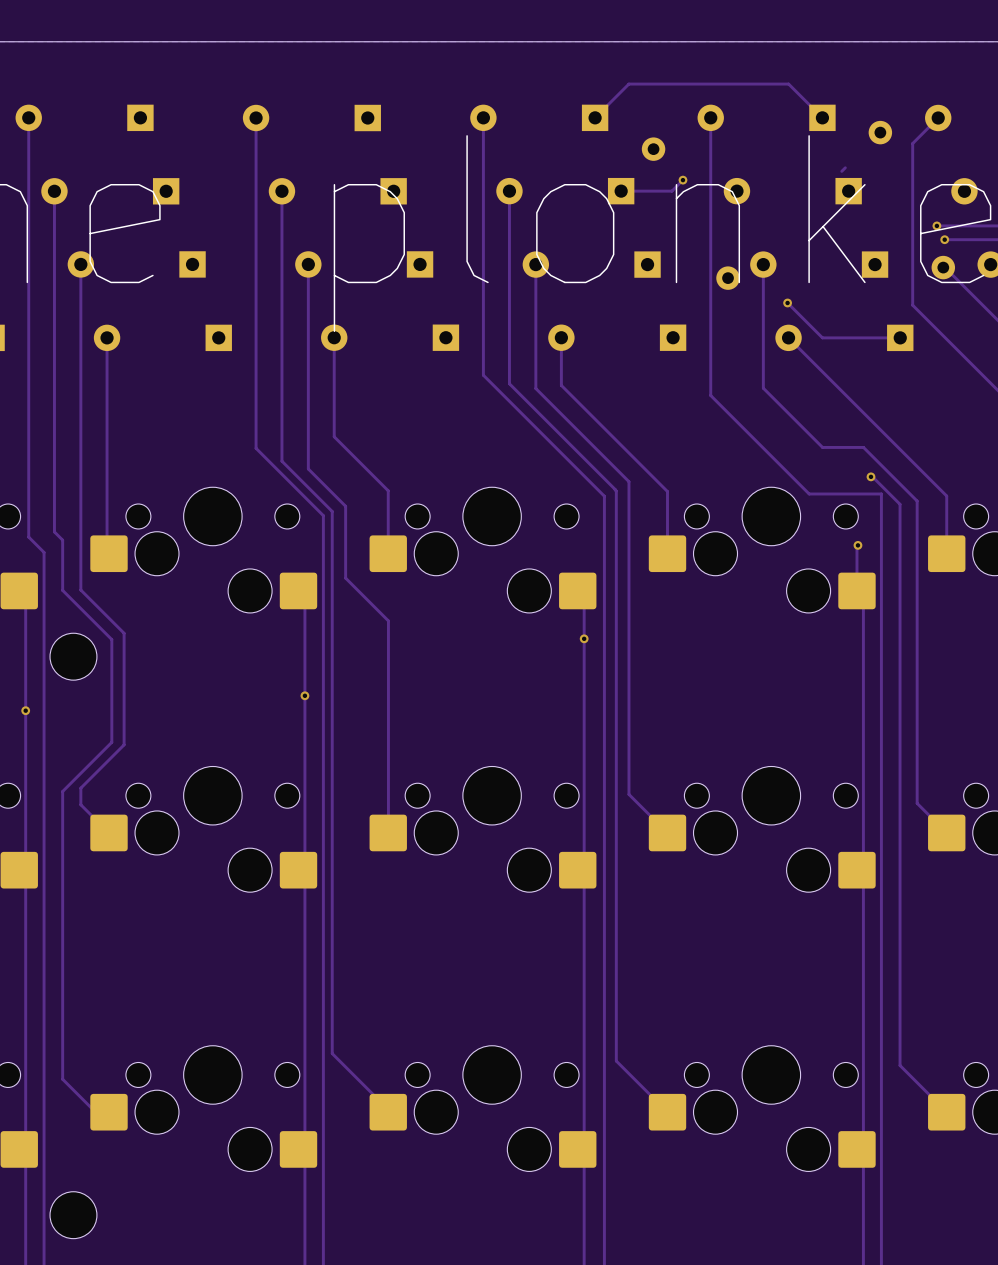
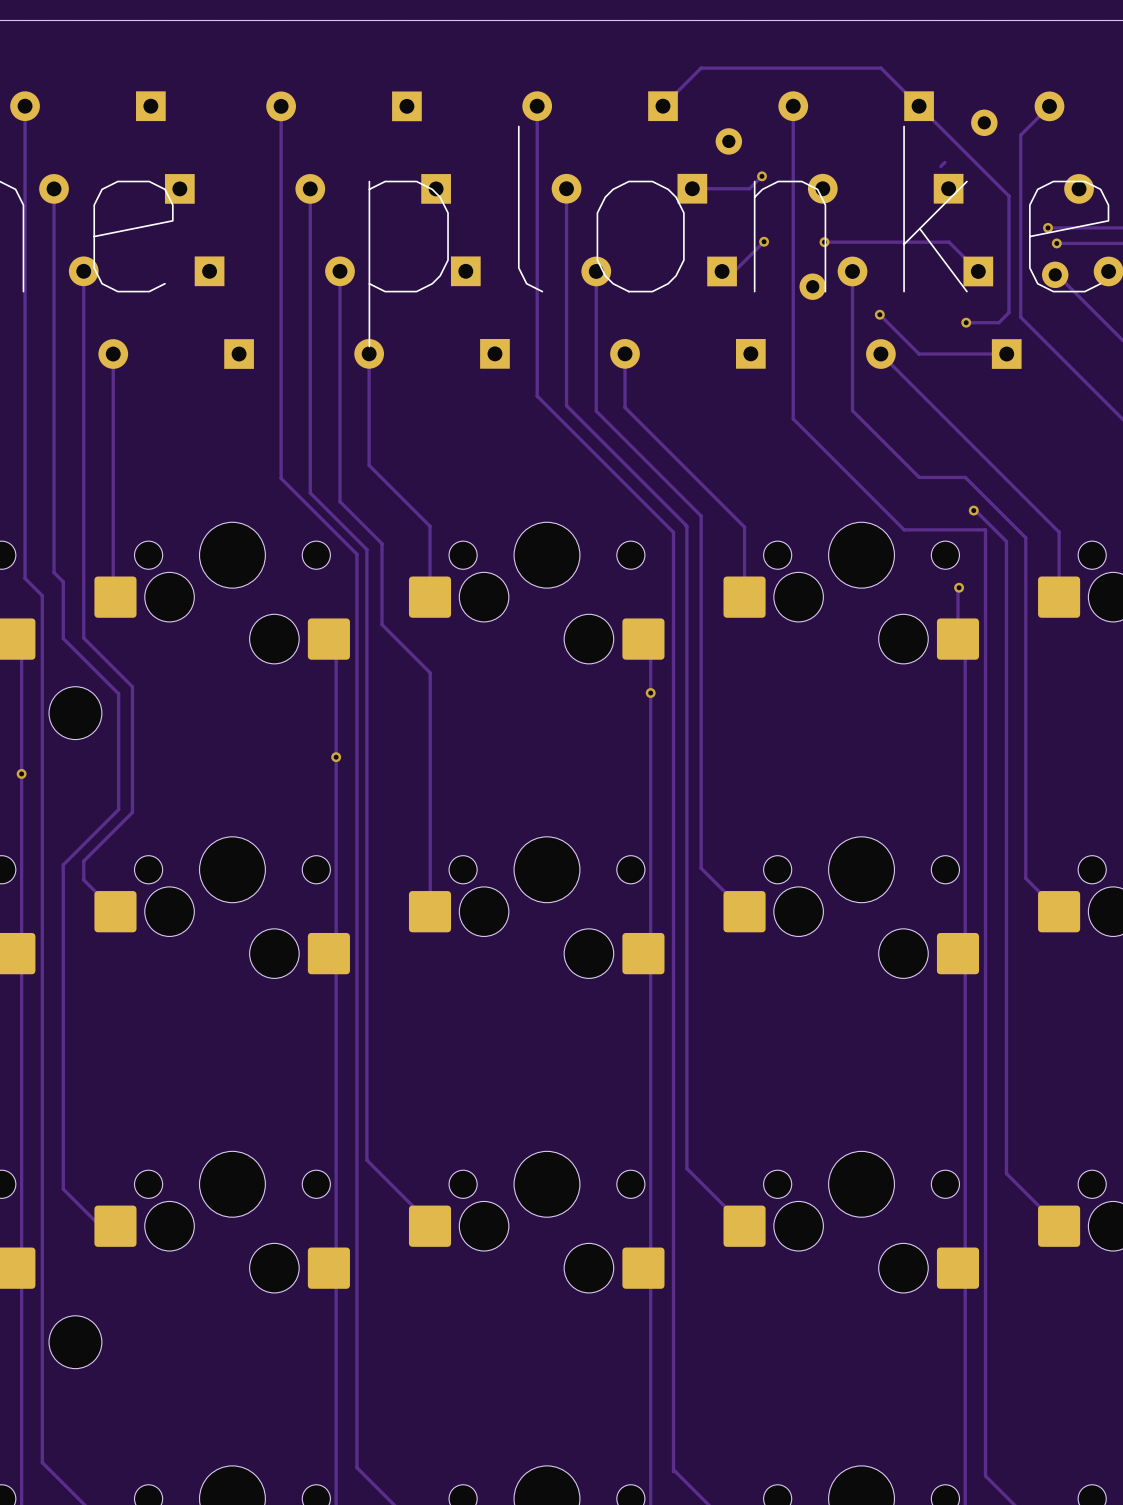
track: none -> (919, 106) (1008, 196) (1008, 312) (998, 322) (966, 322)
track: none -> (764, 241) (734, 271) (722, 271)
via: none -> (764, 241)
track: none -> (824, 242) (949, 242) (978, 271)
via: none -> (824, 242)
via: none -> (966, 322)

